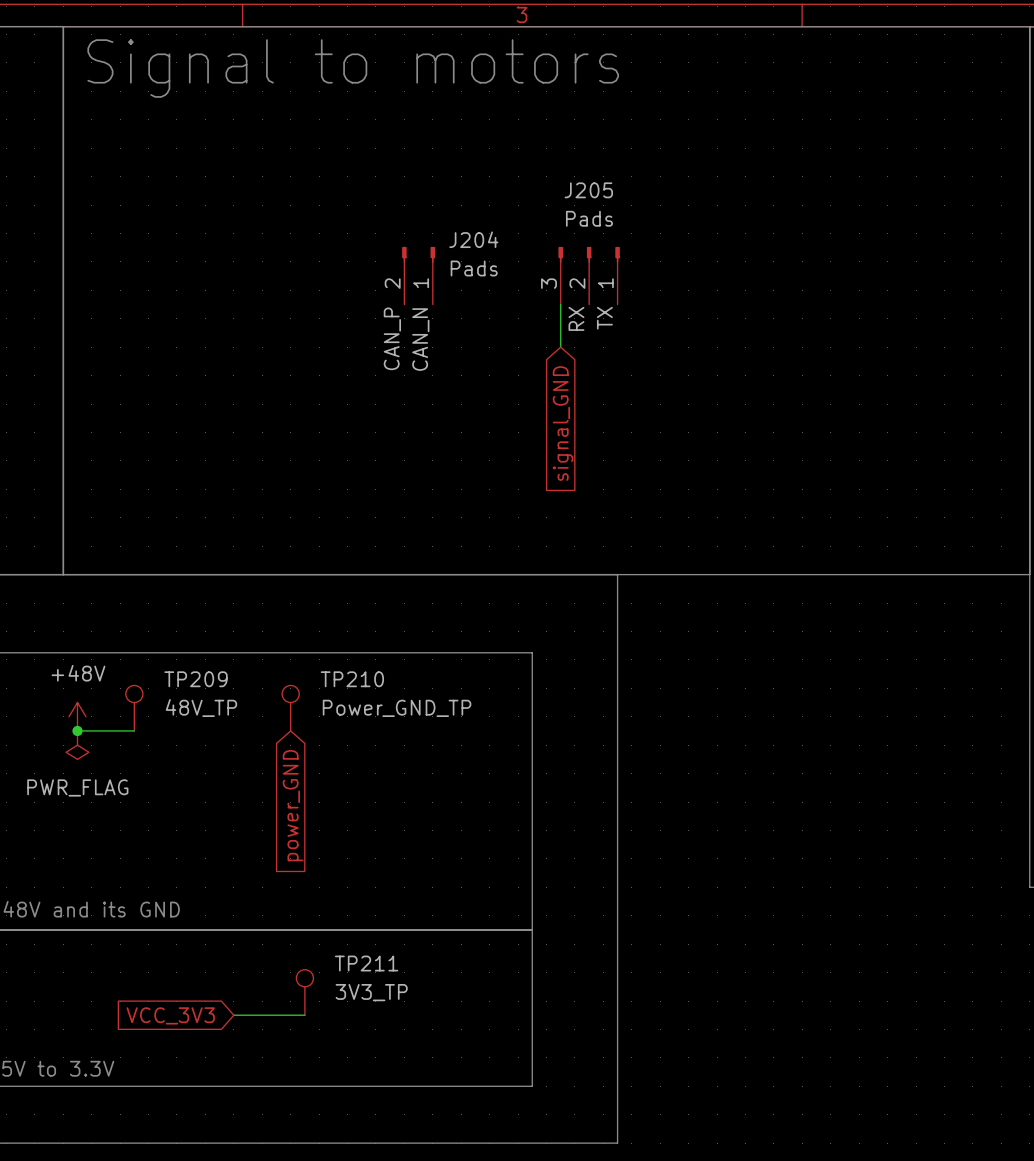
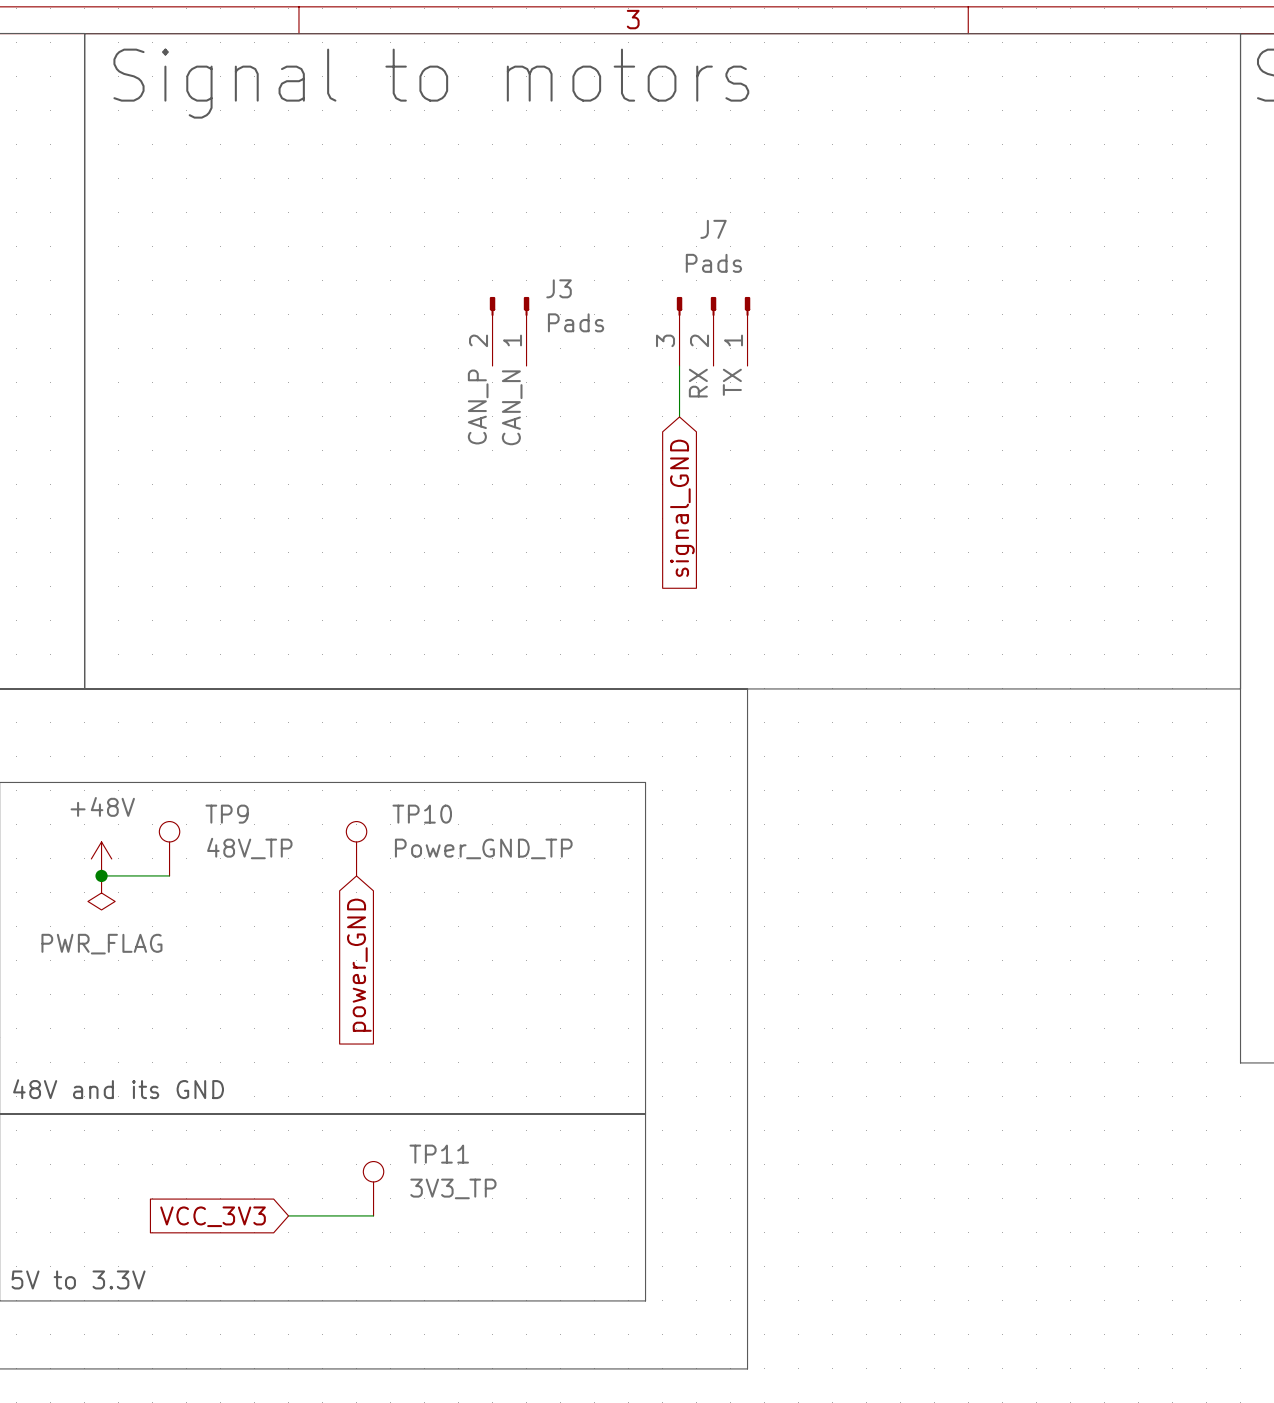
J205 name: J205 (588, 190) -> J7 (713, 229)
J204 name: J204 (473, 239) -> J3 (559, 288)
TP209 name: TP209 (196, 679) -> TP9 (227, 814)
TP210 name: TP210 (352, 679) -> TP10 (422, 814)
TP211 name: TP211 (366, 963) -> TP11 (439, 1154)

